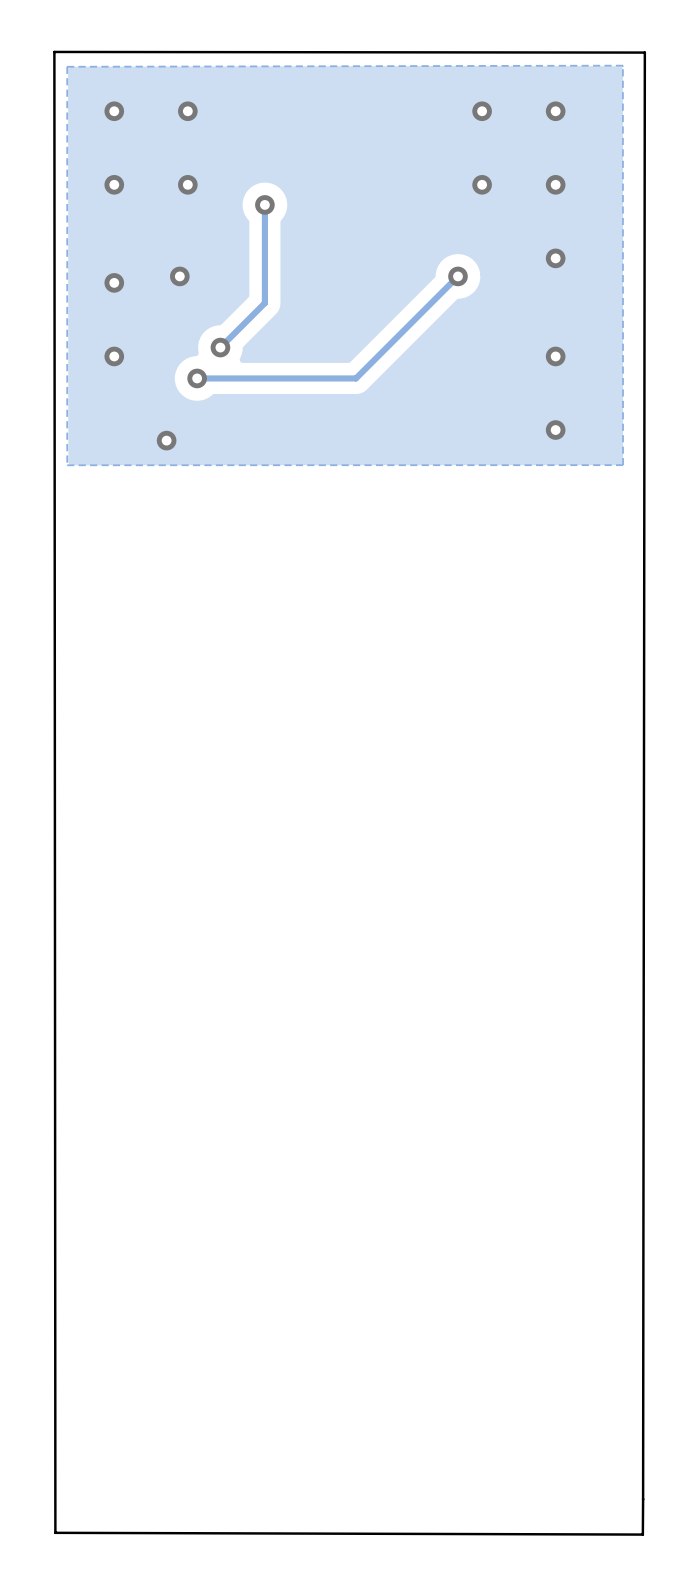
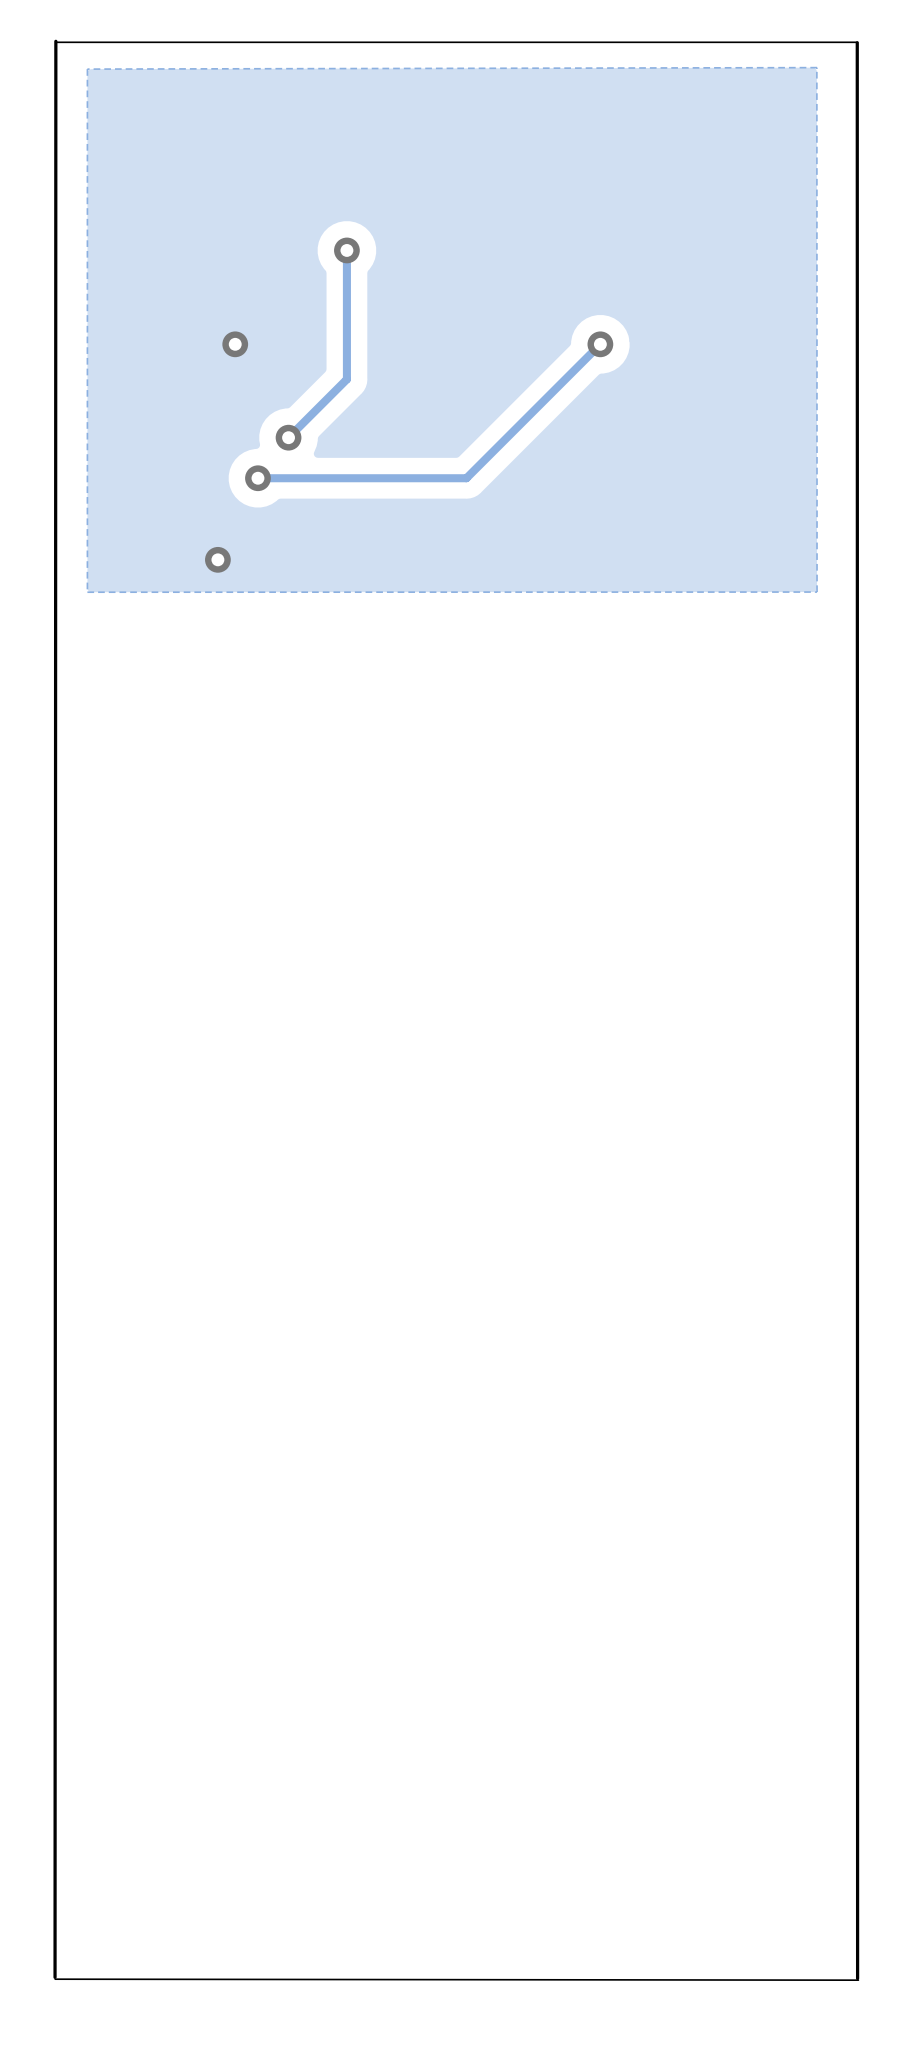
board edge: none -> (55, 41) (55, 1977)
board edge: none -> (857, 42) (55, 42)
board edge: none -> (857, 42) (857, 1978)
board edge: (54, 51) (55, 1532) (642, 1534) (644, 52) (54, 51) -> none
via: (114, 111) -> none
via: (187, 111) -> none
via: (482, 111) -> none
via: (555, 111) -> none
via: (114, 184) -> none
via: (187, 184) -> none
via: (482, 184) -> none
via: (555, 184) -> none
via: (555, 258) -> none
via: (114, 282) -> none
via: (114, 356) -> none
via: (555, 356) -> none
via: (555, 430) -> none
board edge: none -> (55, 1979) (858, 1980)

